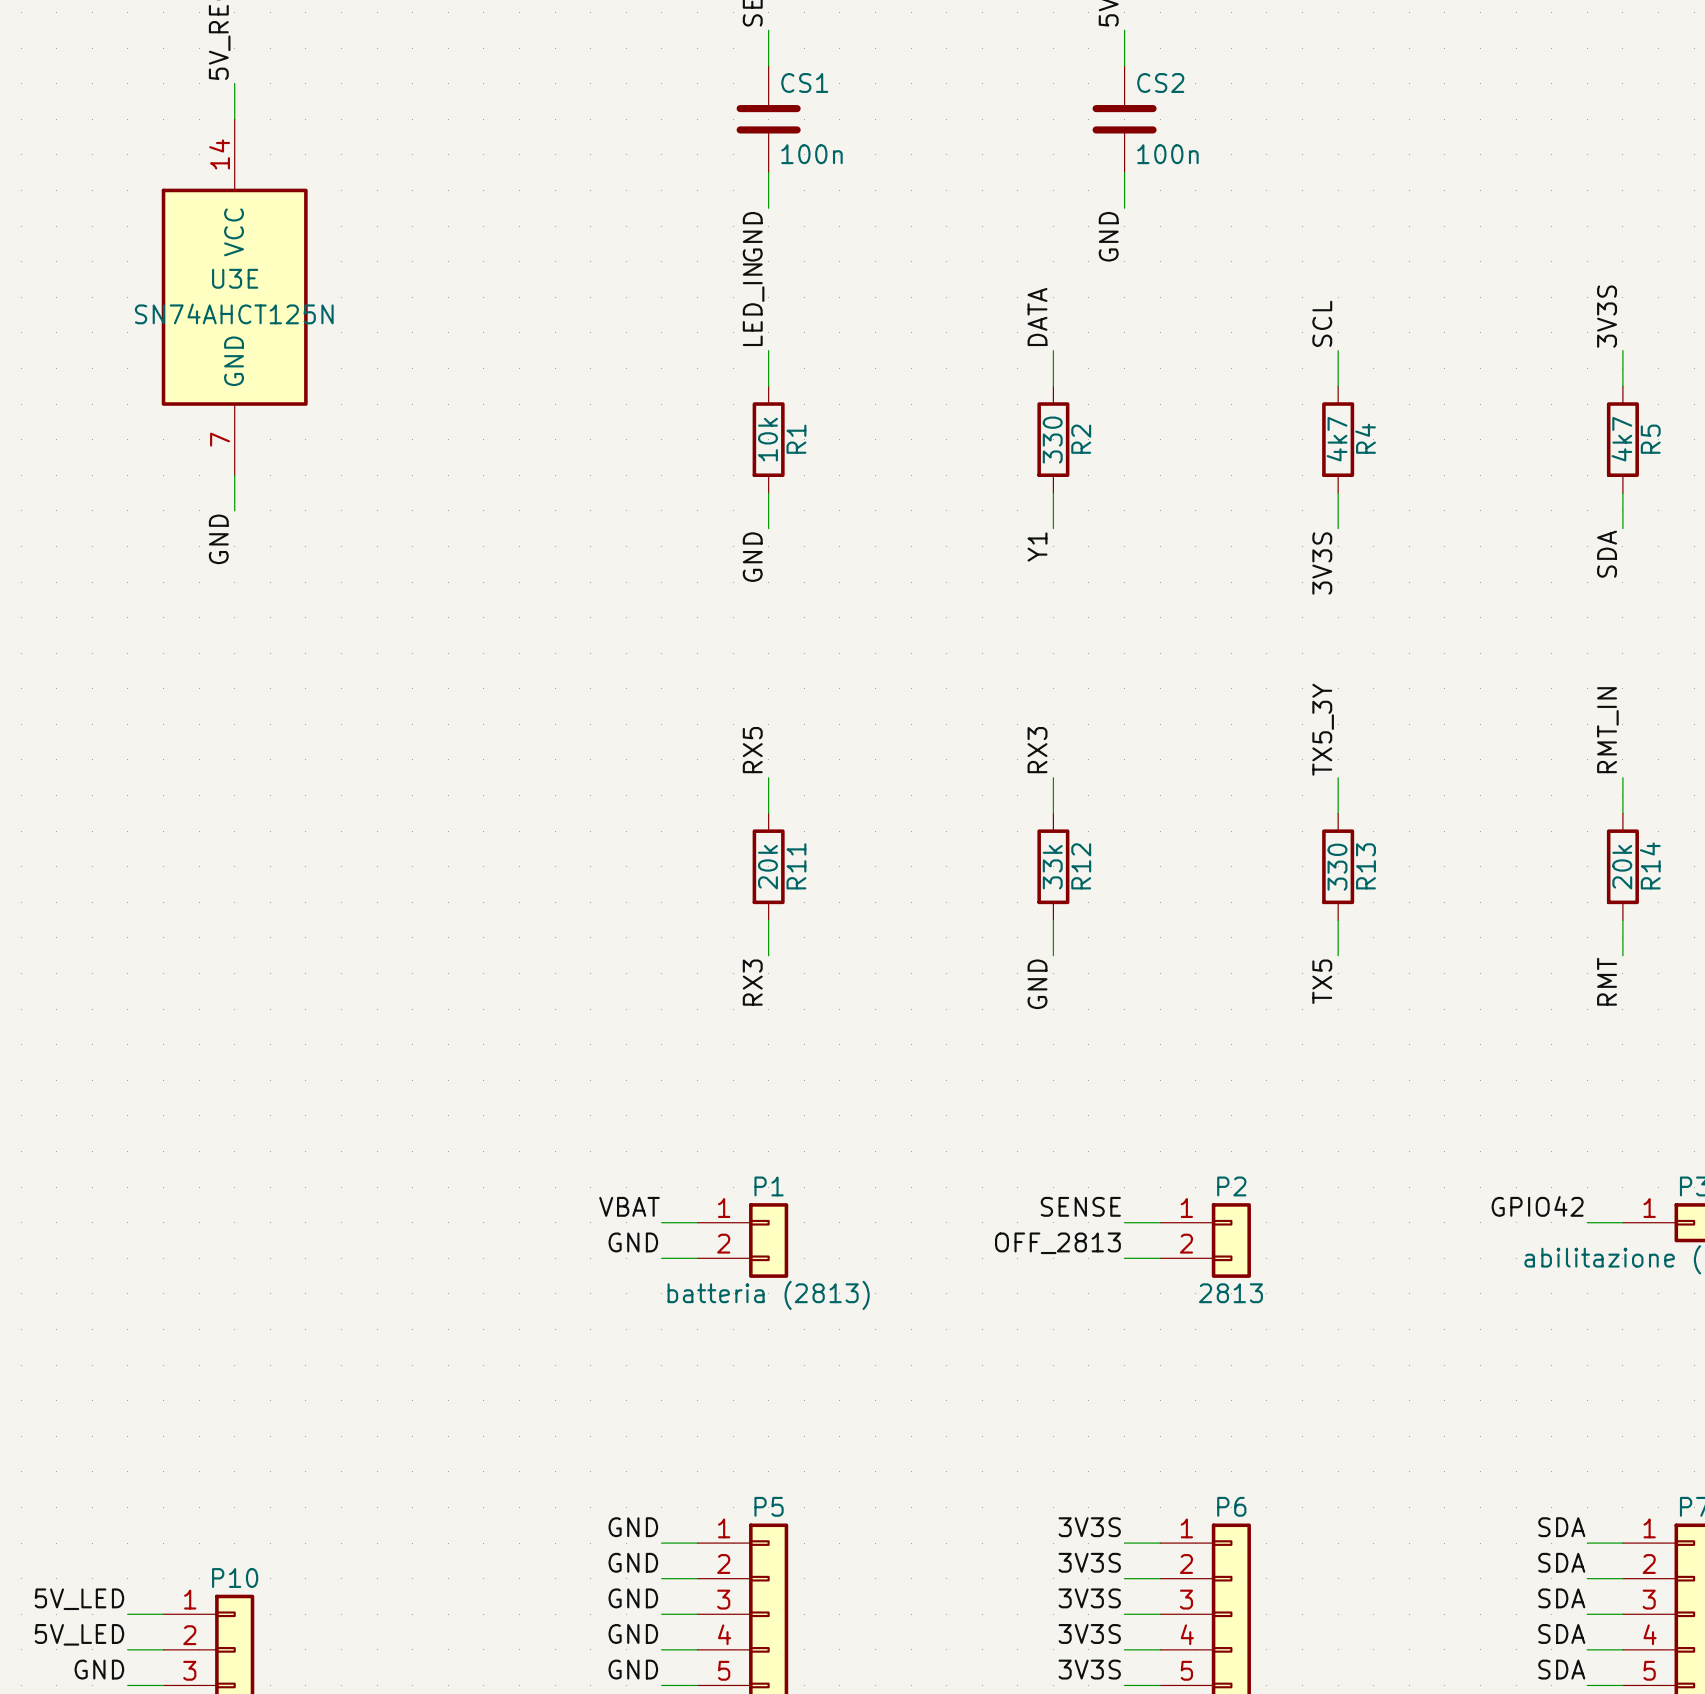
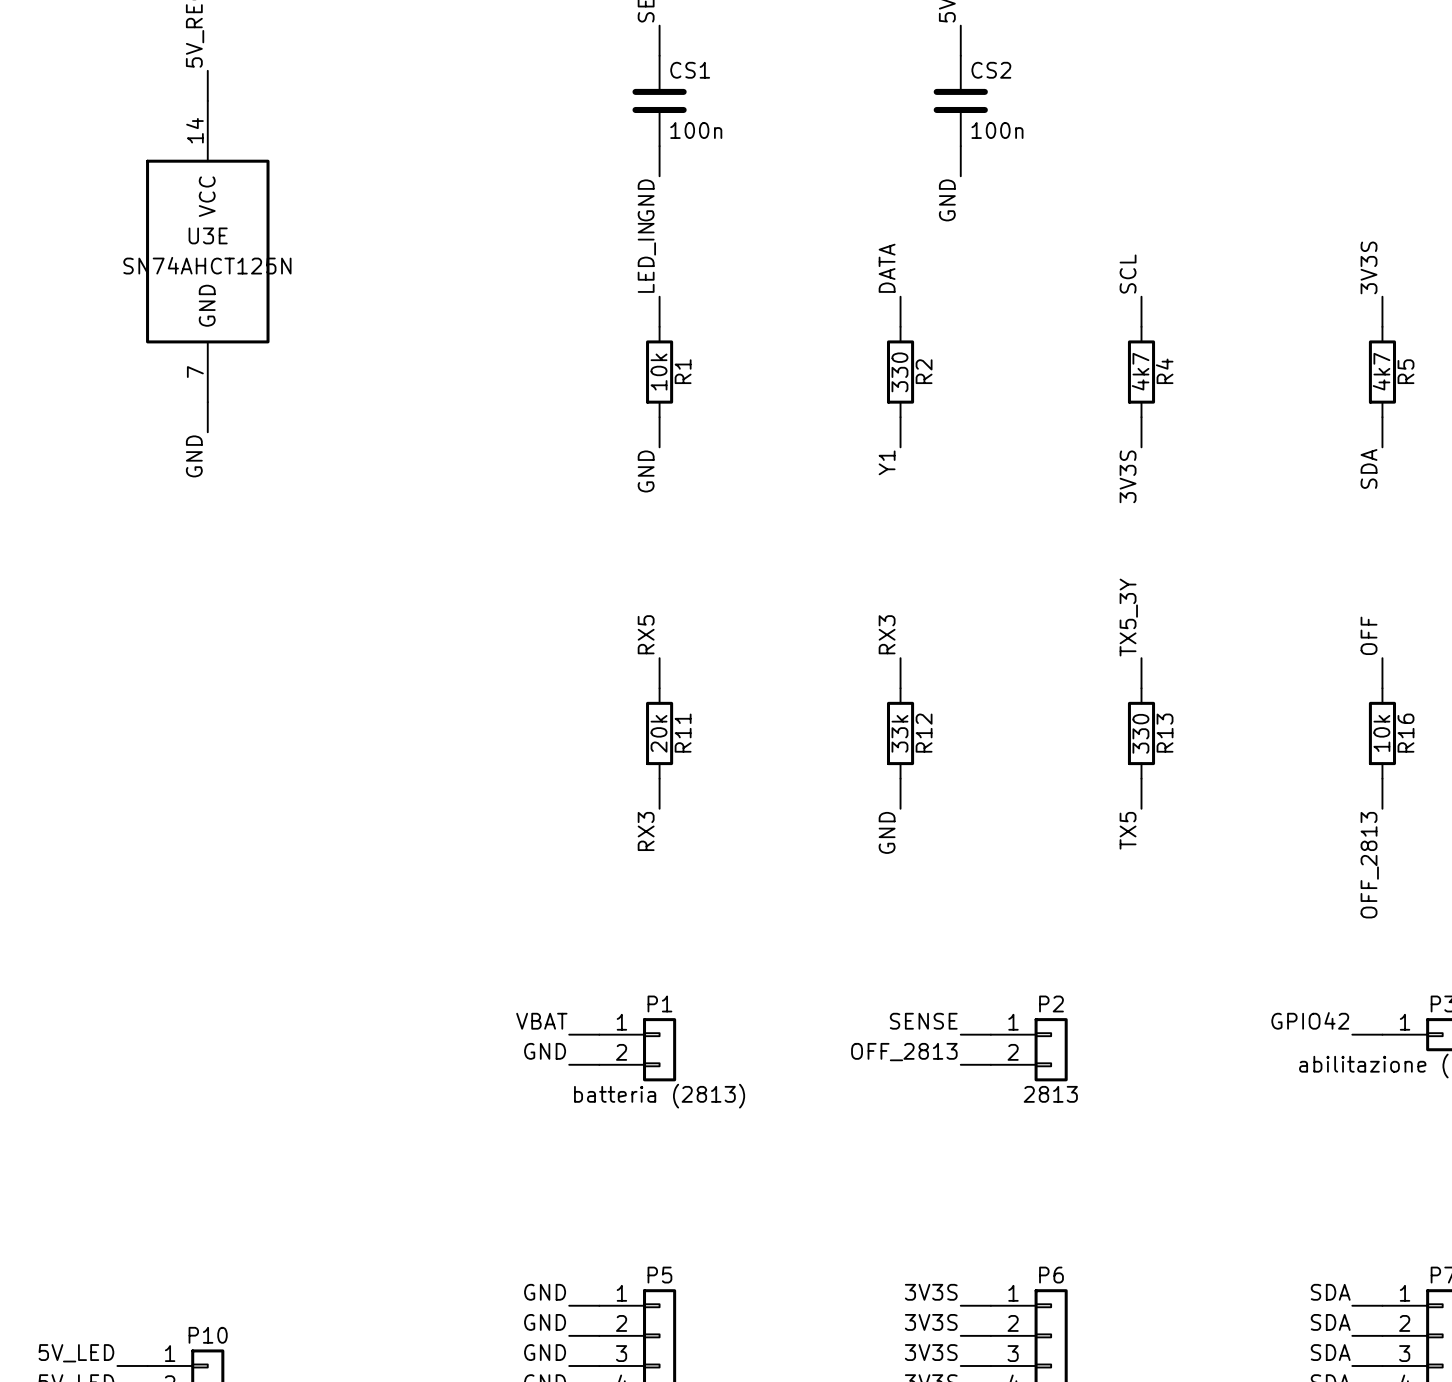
label: RMT_IN (1607, 730) -> OFF (1369, 635)
R14 name: R14 (1650, 865) -> R16 (1405, 733)
R14 value: 20k (1622, 867) -> 10k (1381, 733)
label: RMT (1607, 981) -> OFF_2813 (1369, 865)

